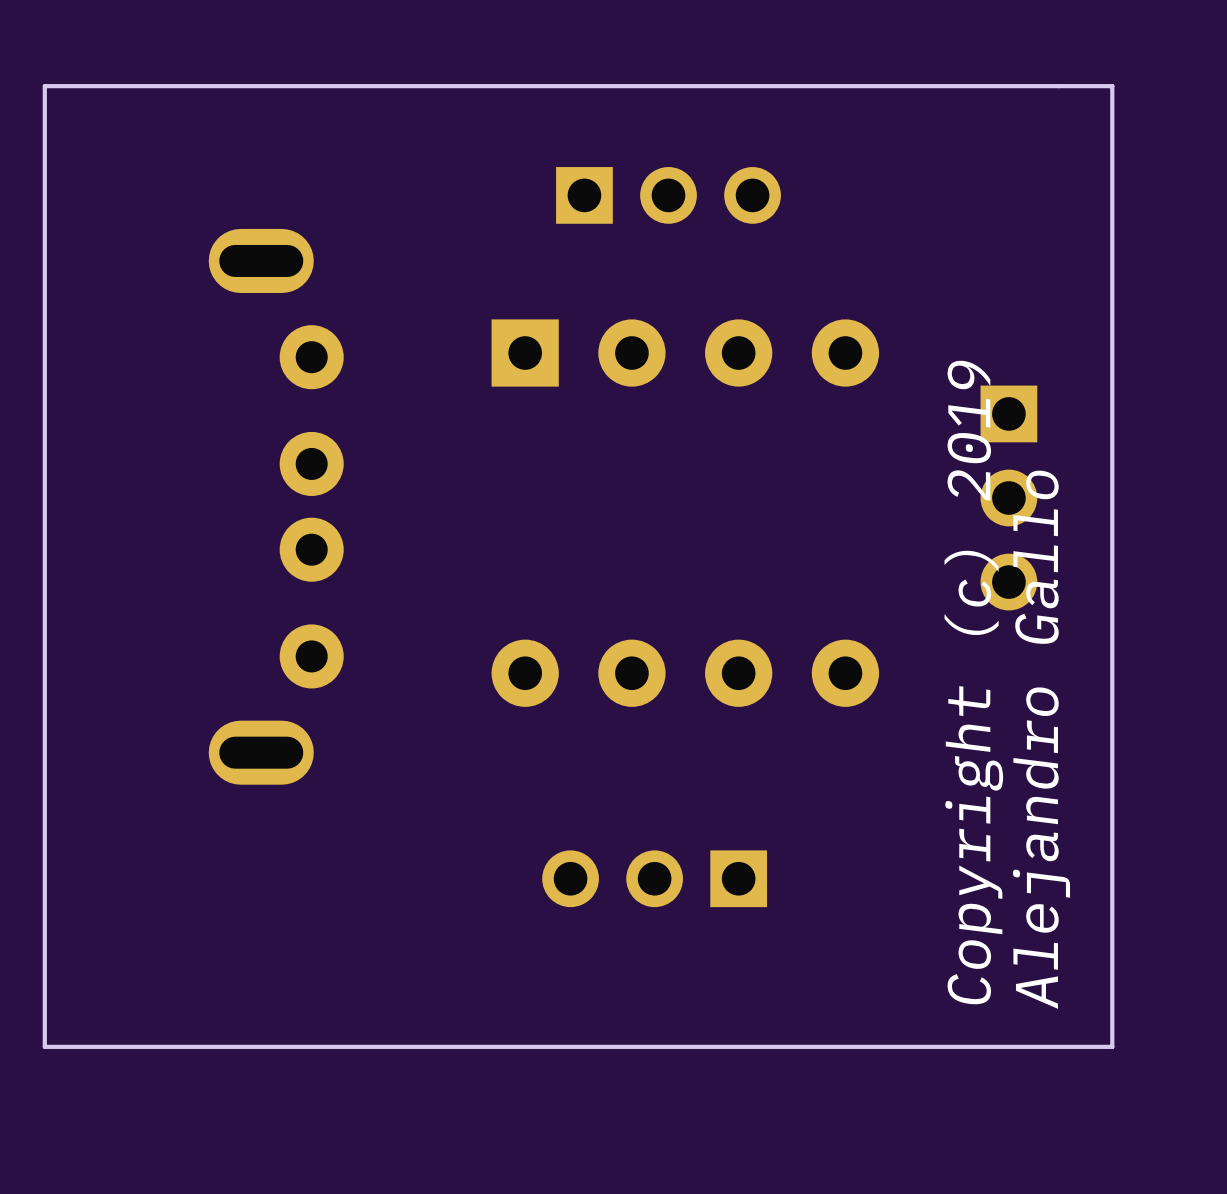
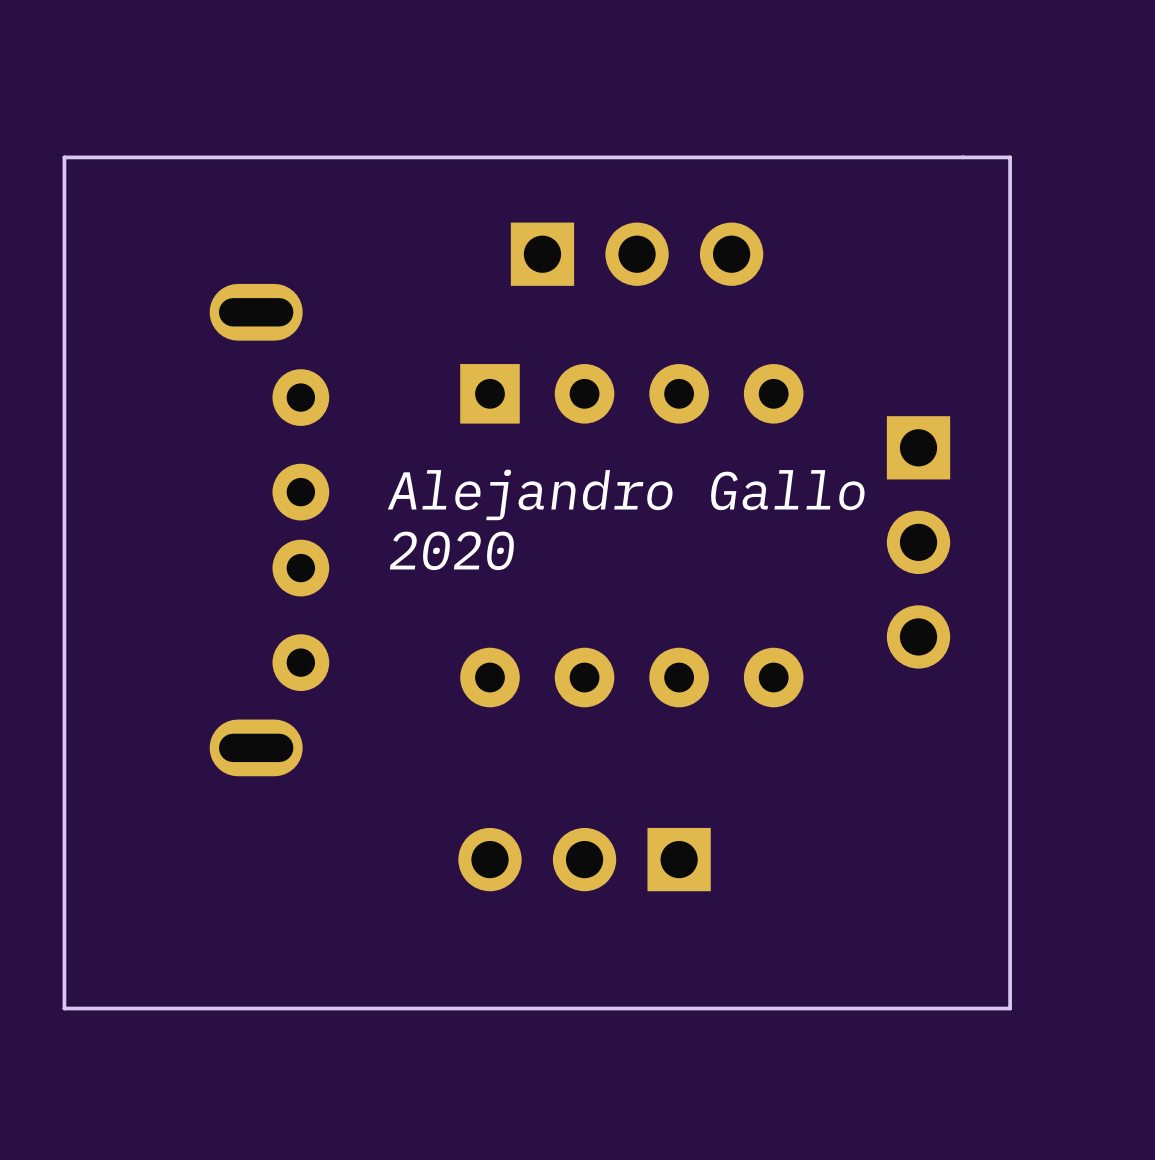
part footprint: [556, 167, 781, 224] -> [510, 222, 764, 286]
part footprint: [980, 385, 1038, 611] -> [886, 416, 951, 669]
text: none -> 2020 (451, 550)
text: Copyright (c) 2019 (973, 682) -> none
text rotation: 0° (1041, 739) -> 90° clockwise (626, 494)
part footprint: [542, 850, 768, 908] -> [458, 827, 711, 892]

